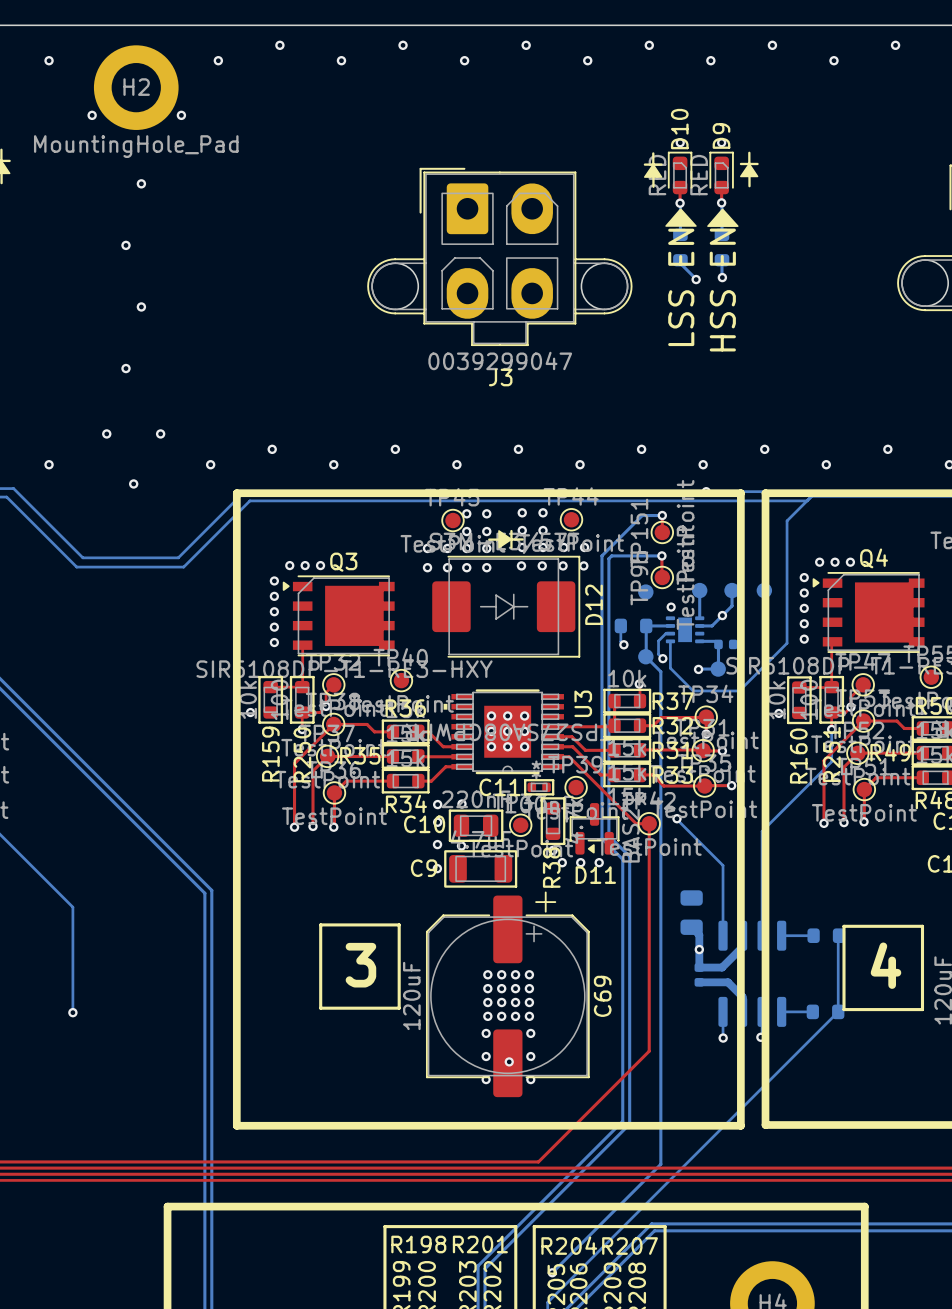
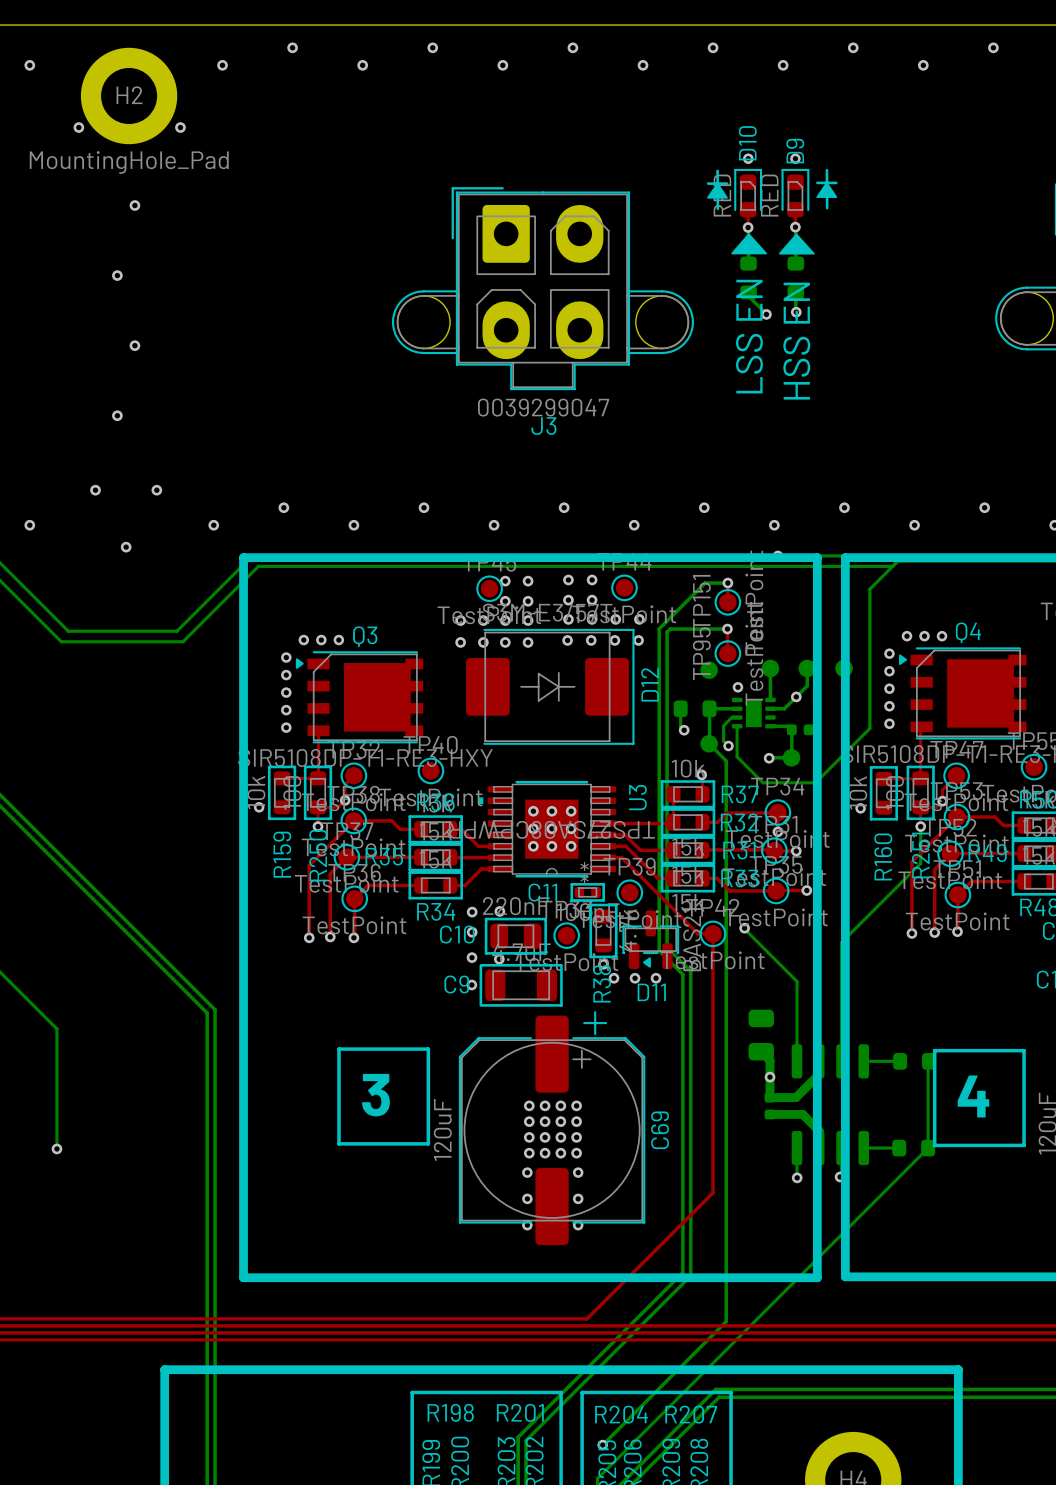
drawing: [498, 530, 513, 549] -> none
line: (511, 531) (511, 547) -> none
line: (489, 539) (501, 539) -> none
line: (511, 539) (522, 539) -> none
via: (509, 1061) -> none

